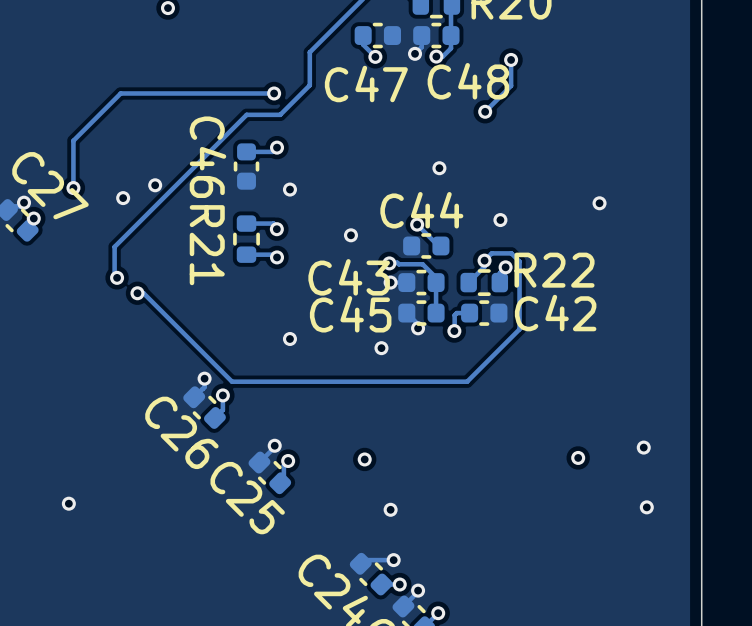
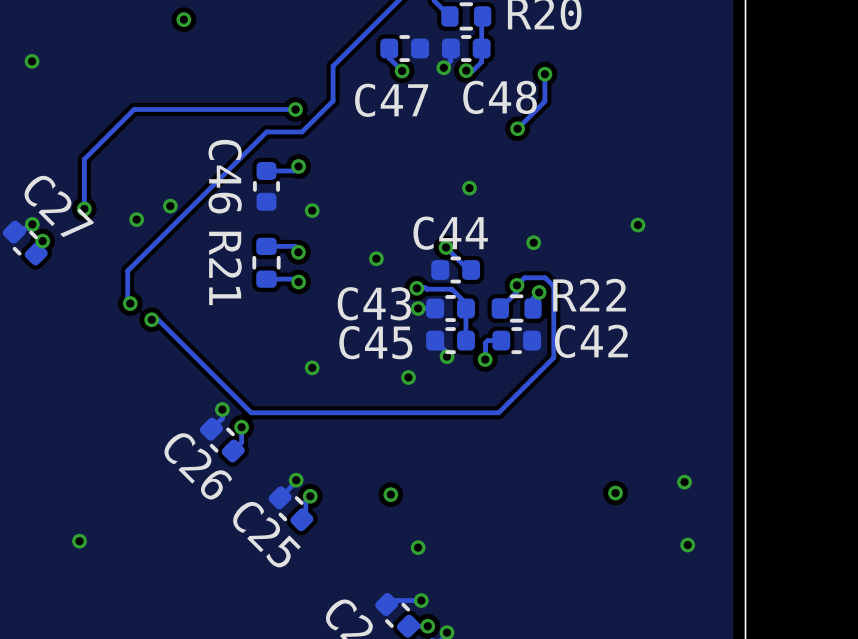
via: none -> (32, 61)

